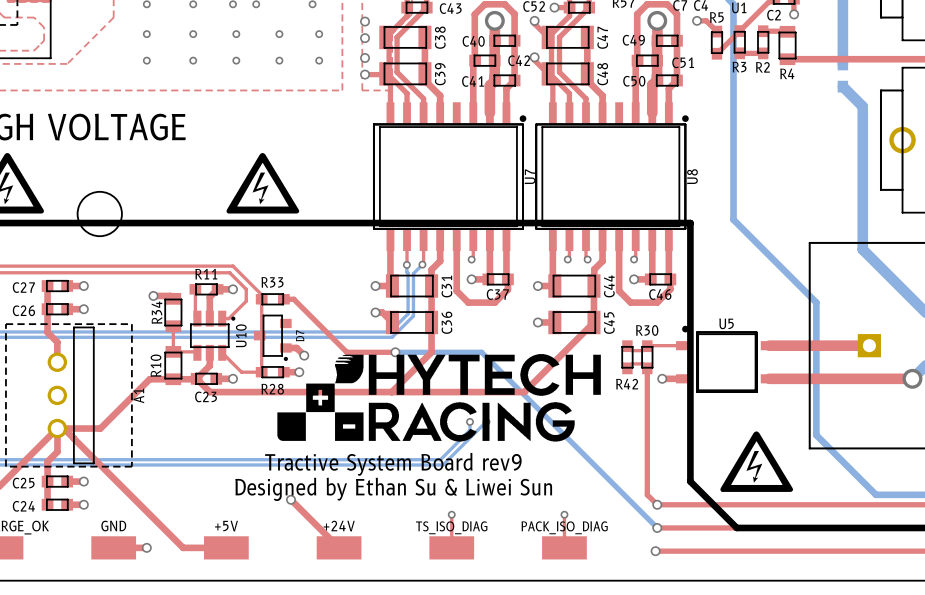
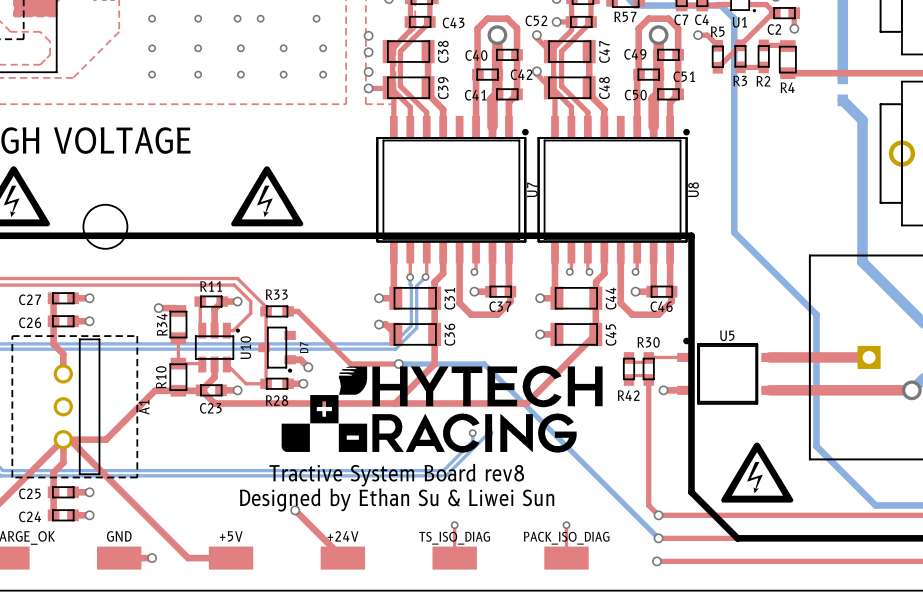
text: Tractive System Board rev9 (393, 464) -> Tractive System Board rev8 (396, 475)

